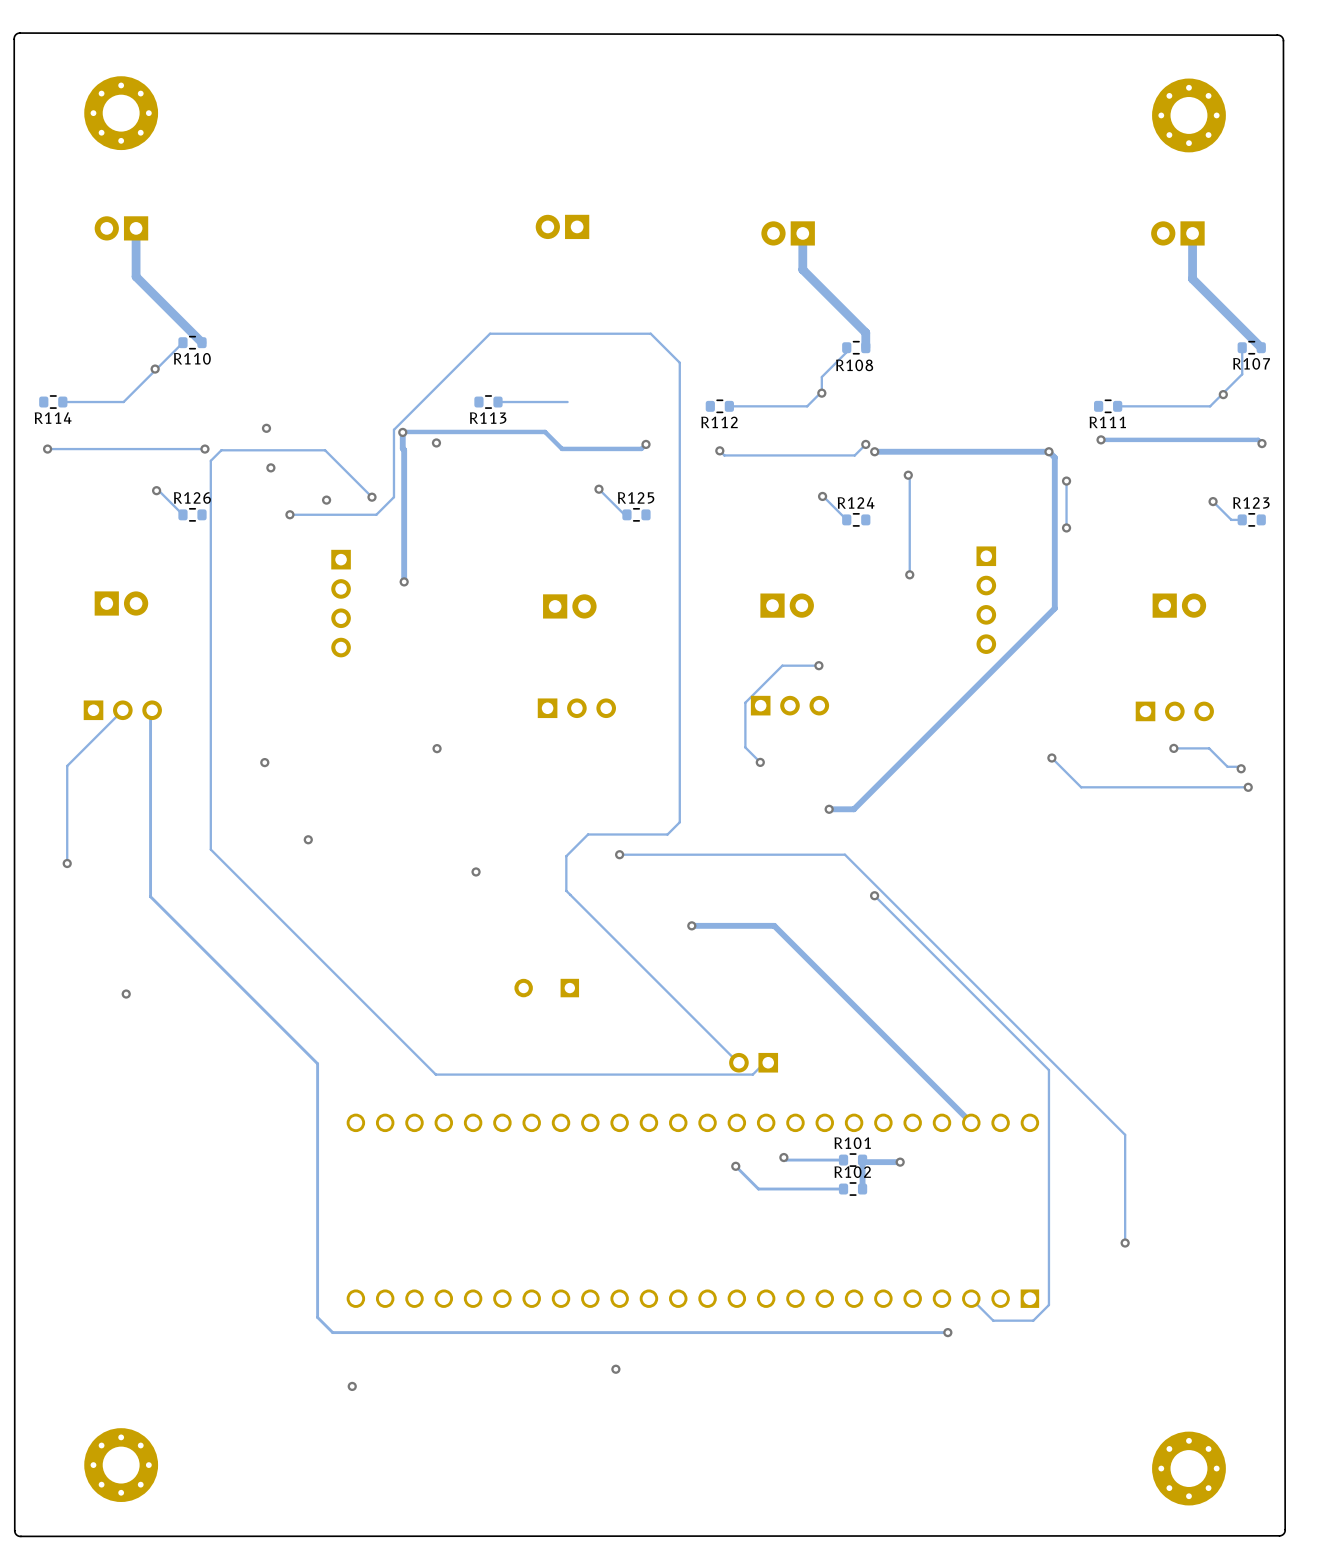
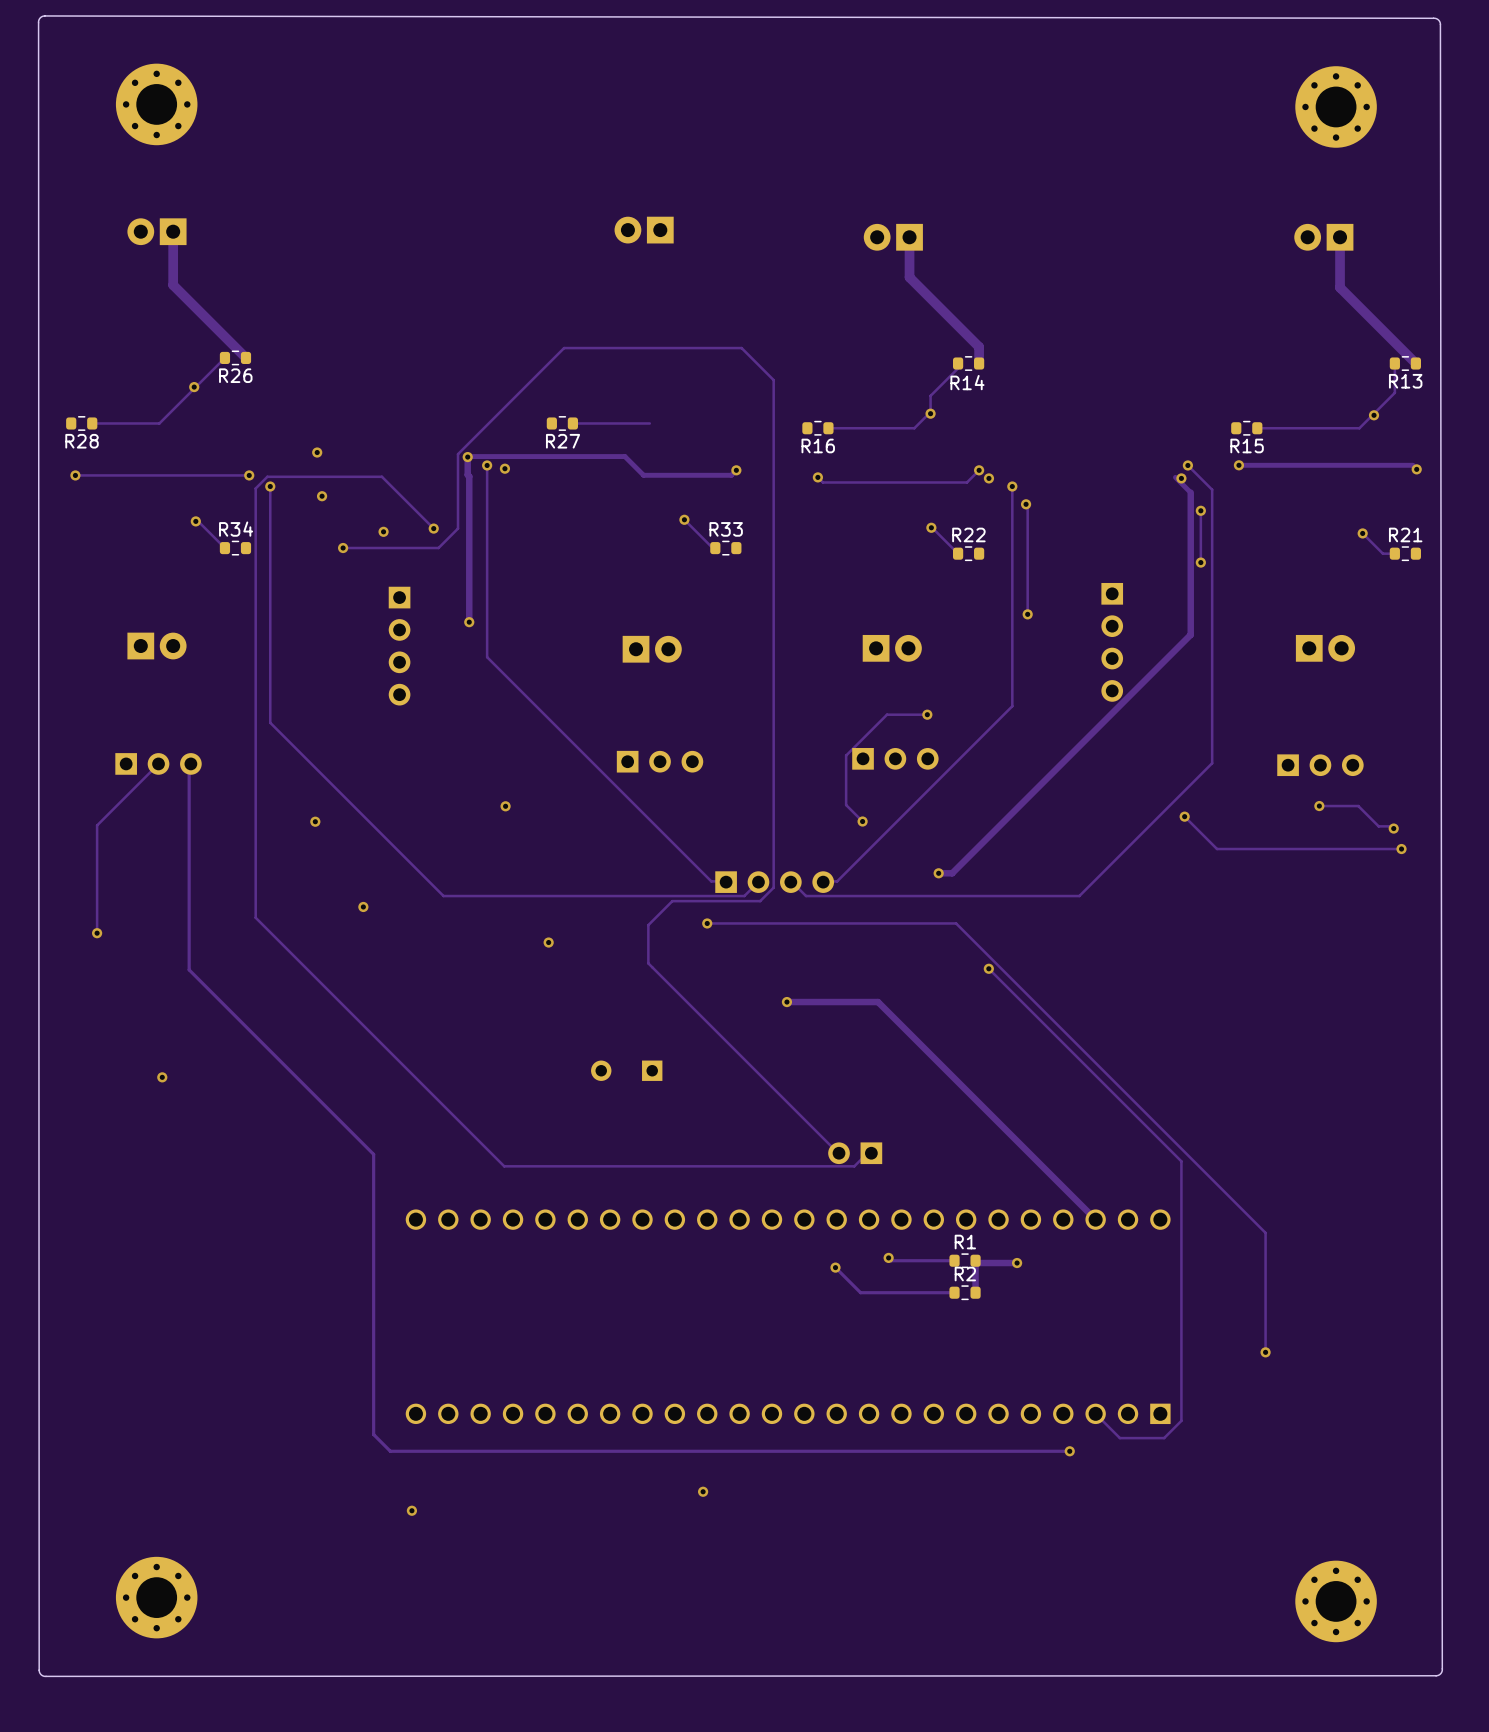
R110 name: R110 (192, 358) -> R26 (235, 375)
R107 name: R107 (1251, 363) -> R13 (1405, 381)
R108 name: R108 (854, 365) -> R14 (967, 382)
R114 name: R114 (53, 418) -> R28 (82, 441)
R113 name: R113 (488, 418) -> R27 (562, 441)
R112 name: R112 (719, 422) -> R16 (818, 445)
R111 name: R111 (1107, 422) -> R15 (1247, 445)
track: none -> (487, 465) (487, 657) (711, 881) (726, 881)
via: none -> (487, 465)
track: none -> (1187, 465) (1212, 489) (1212, 763) (1079, 896) (806, 896) (791, 881)
via: none -> (1187, 465)
track: (874, 451) (1048, 451) (1054, 457) (1054, 608) (853, 809) (841, 809) -> (1175, 477) (1190, 492) (1190, 634) (952, 873)
track: none -> (270, 486) (270, 722) (443, 896) (744, 896) (759, 881)
via: none -> (270, 486)
track: none -> (1012, 486) (1012, 706) (837, 881) (823, 881)
via: none -> (1012, 486)
R126 name: R126 (192, 497) -> R34 (236, 529)
R125 name: R125 (636, 497) -> R33 (726, 529)
R124 name: R124 (856, 502) -> R22 (968, 534)
R123 name: R123 (1251, 502) -> R21 (1405, 534)
part: none -> (774, 882)
R101 name: R101 (852, 1143) -> R1 (965, 1242)
R102 name: R102 (852, 1172) -> R2 (965, 1274)

